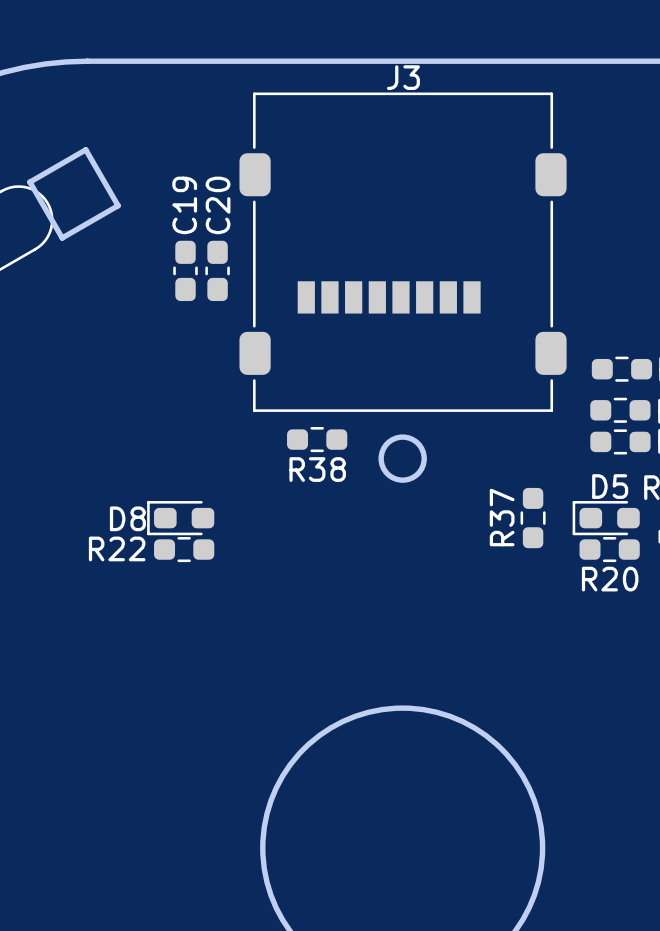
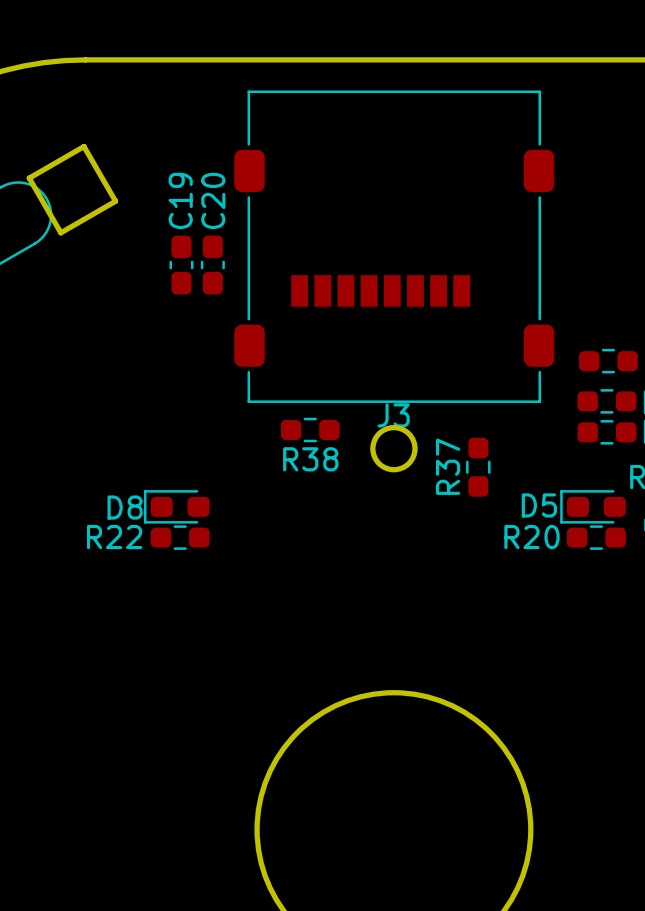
J3 name position: J3 (403, 77) -> J3 (393, 415)
D5 name position: D5 (610, 486) -> D5 (539, 505)
R37 position: (533, 518) -> (478, 467)
R20 name position: R20 (610, 579) -> R20 (532, 537)

